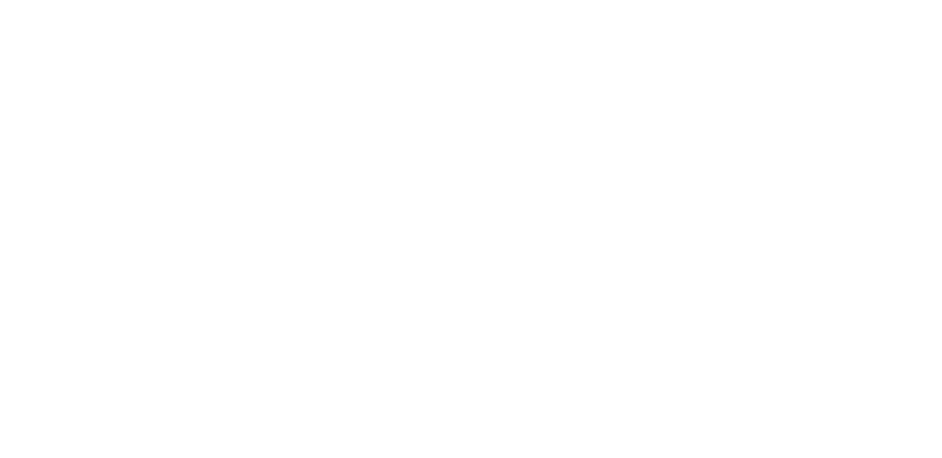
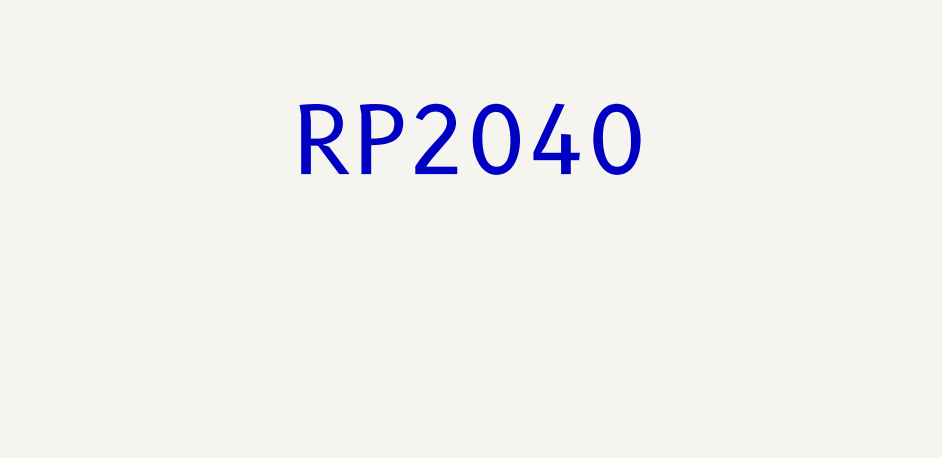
text: none -> RP2040 (470, 139)

